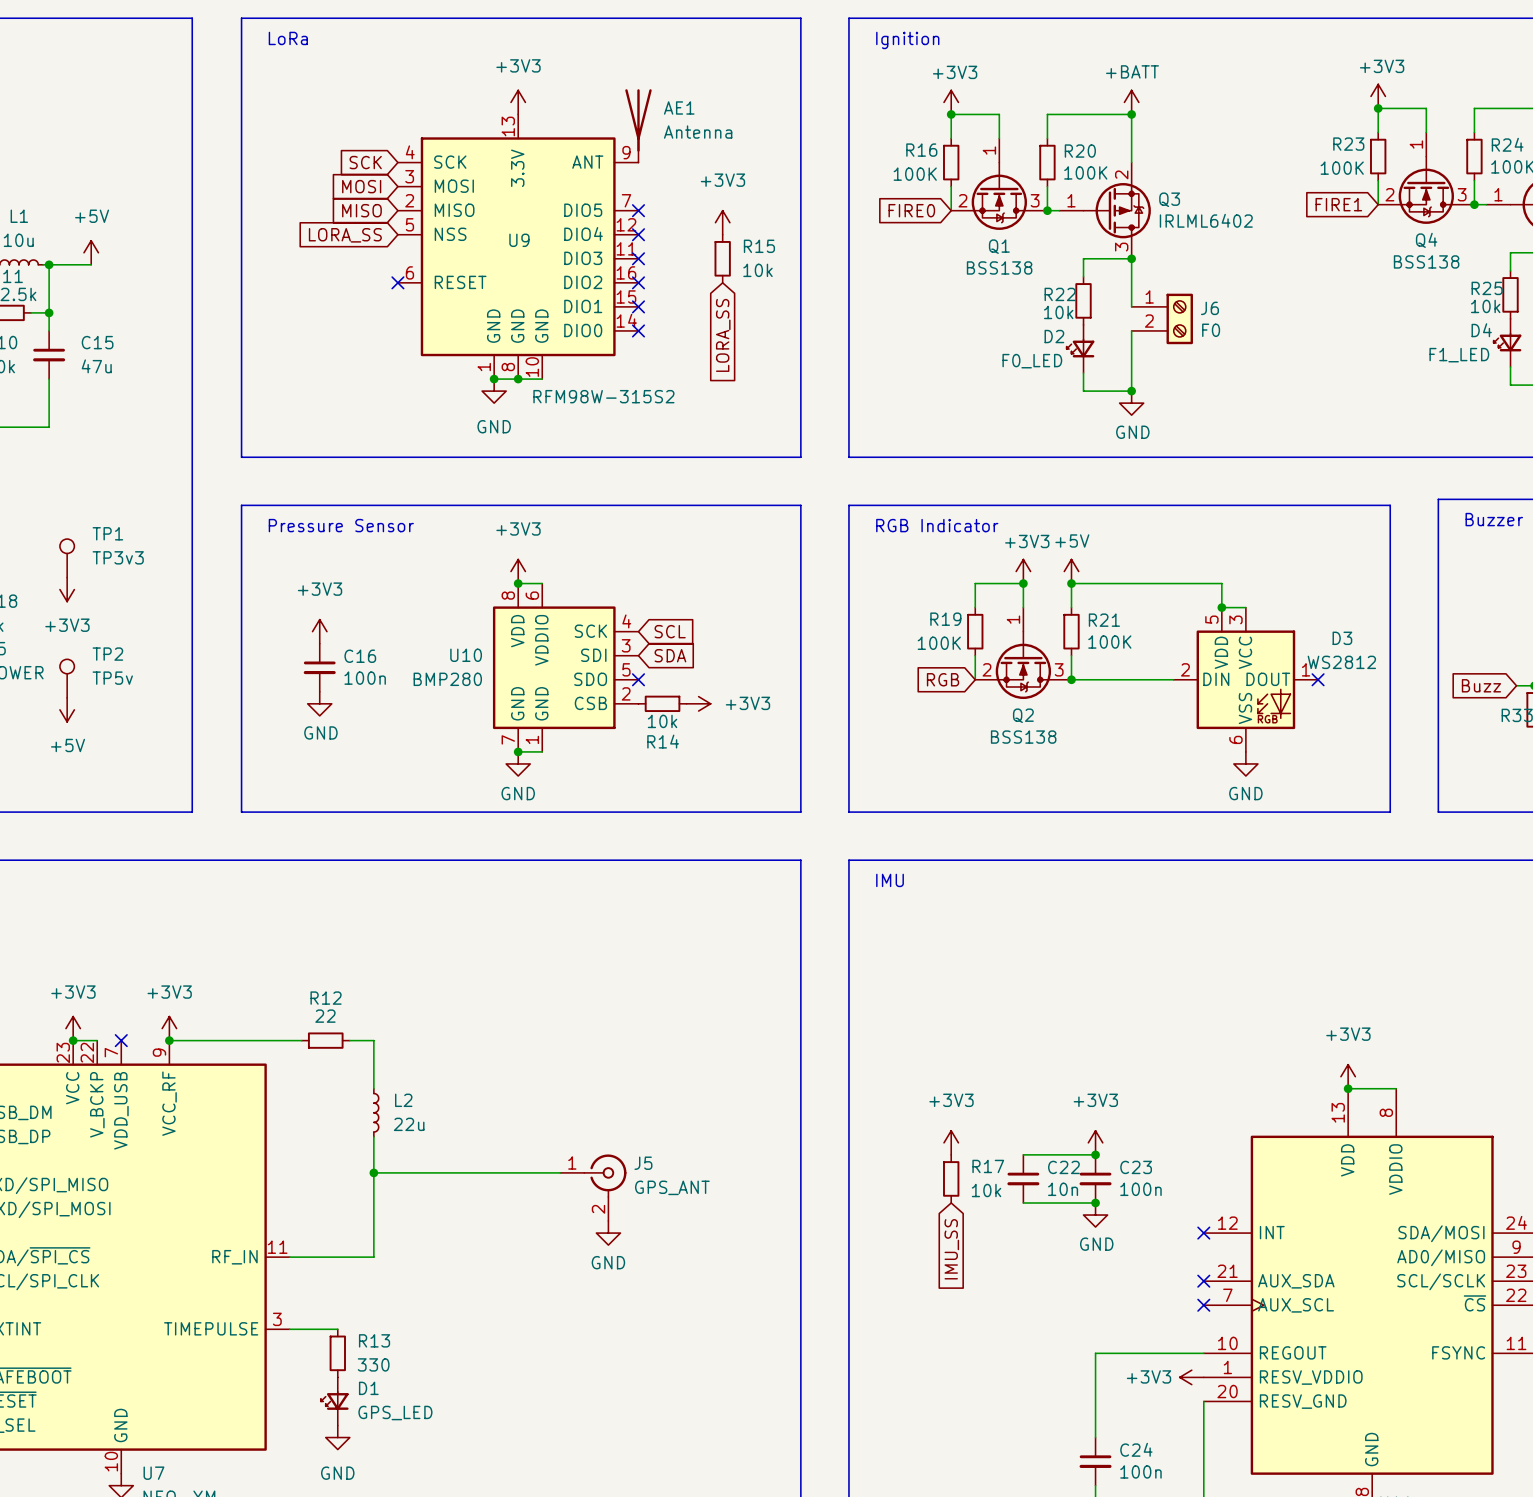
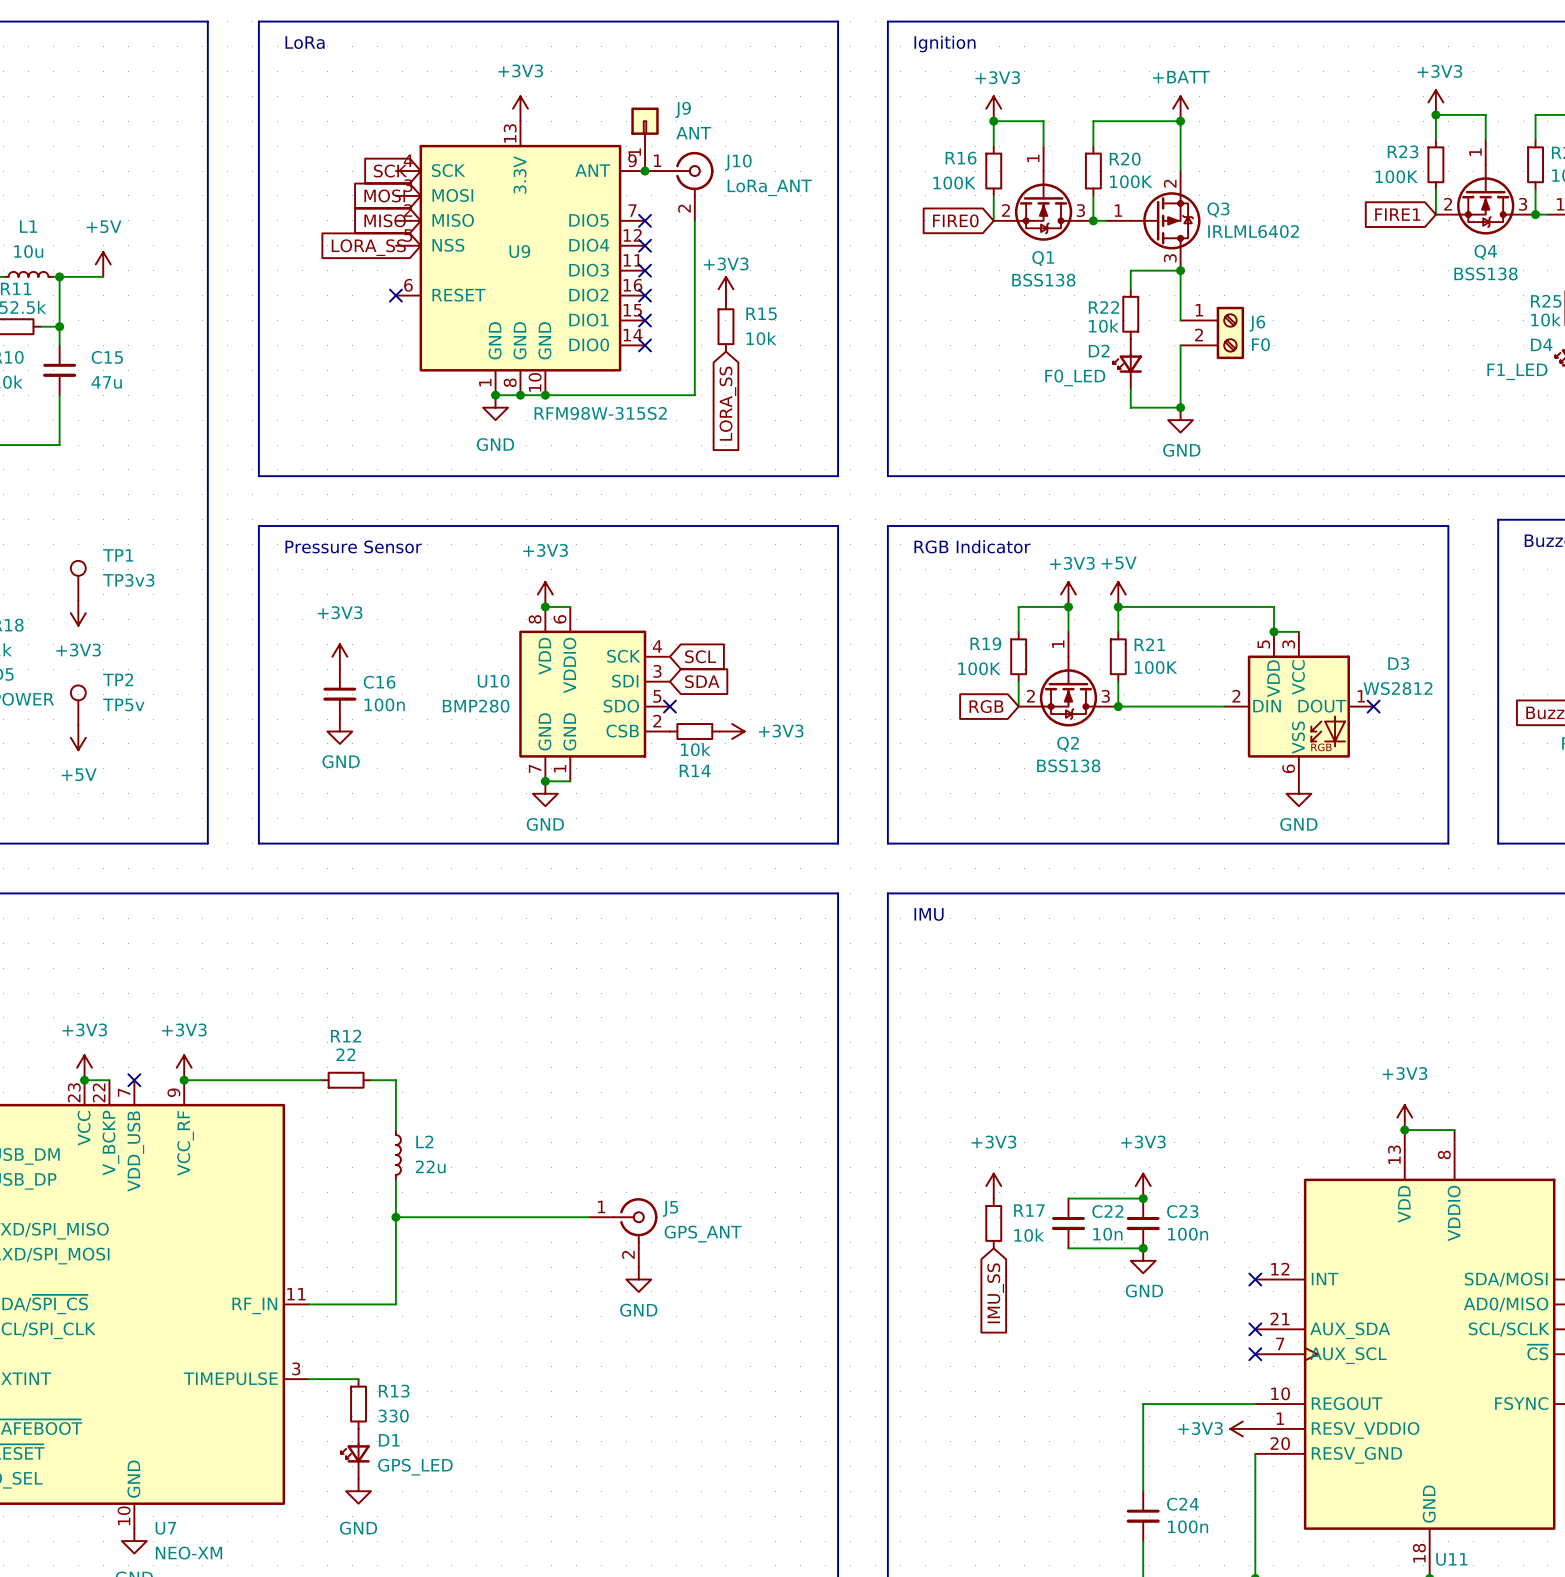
power symbol position: +3V3 (518, 102) -> +3V3 (520, 108)
AE1: Antenna (638, 125) -> none
J9: none -> ANT (645, 139)
junction: none -> (645, 171)
J10: none -> LoRa_ANT (679, 186)
power symbol text position: +3V3 (722, 180) -> +3V3 (726, 263)
no-connect mark: none -> (645, 220)
no-connect mark: (638, 210) -> none
wire: none -> (694, 220) (694, 395) (570, 395)
power symbol position: +3V3 (722, 222) -> +3V3 (725, 289)
no-connect mark: none -> (645, 245)
no-connect mark: (638, 234) -> none
U9 position: (518, 246) -> (520, 258)
no-connect mark: none -> (645, 270)
no-connect mark: (638, 258) -> none
R15 position: (722, 258) -> (725, 326)
no-connect mark position: (397, 282) -> (395, 295)
no-connect mark: none -> (645, 295)
no-connect mark: (638, 282) -> none
no-connect mark: none -> (645, 320)
no-connect mark: (638, 306) -> none
no-connect mark: none -> (645, 345)
no-connect mark: (638, 330) -> none
global label position: LORA_SS (723, 335) -> LORA_SS (727, 403)
wire: none -> (495, 395) (520, 395)
junction: none -> (495, 395)
power symbol position: GND (494, 391) -> GND (495, 407)

